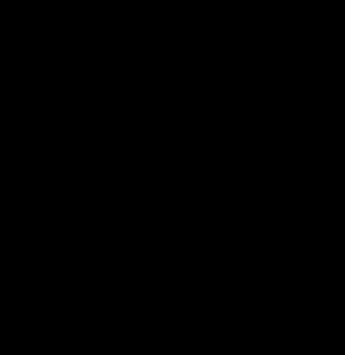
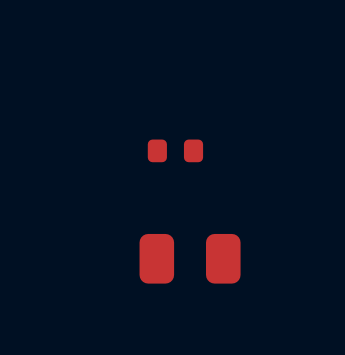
part: none -> (175, 150)
part: none -> (190, 258)

